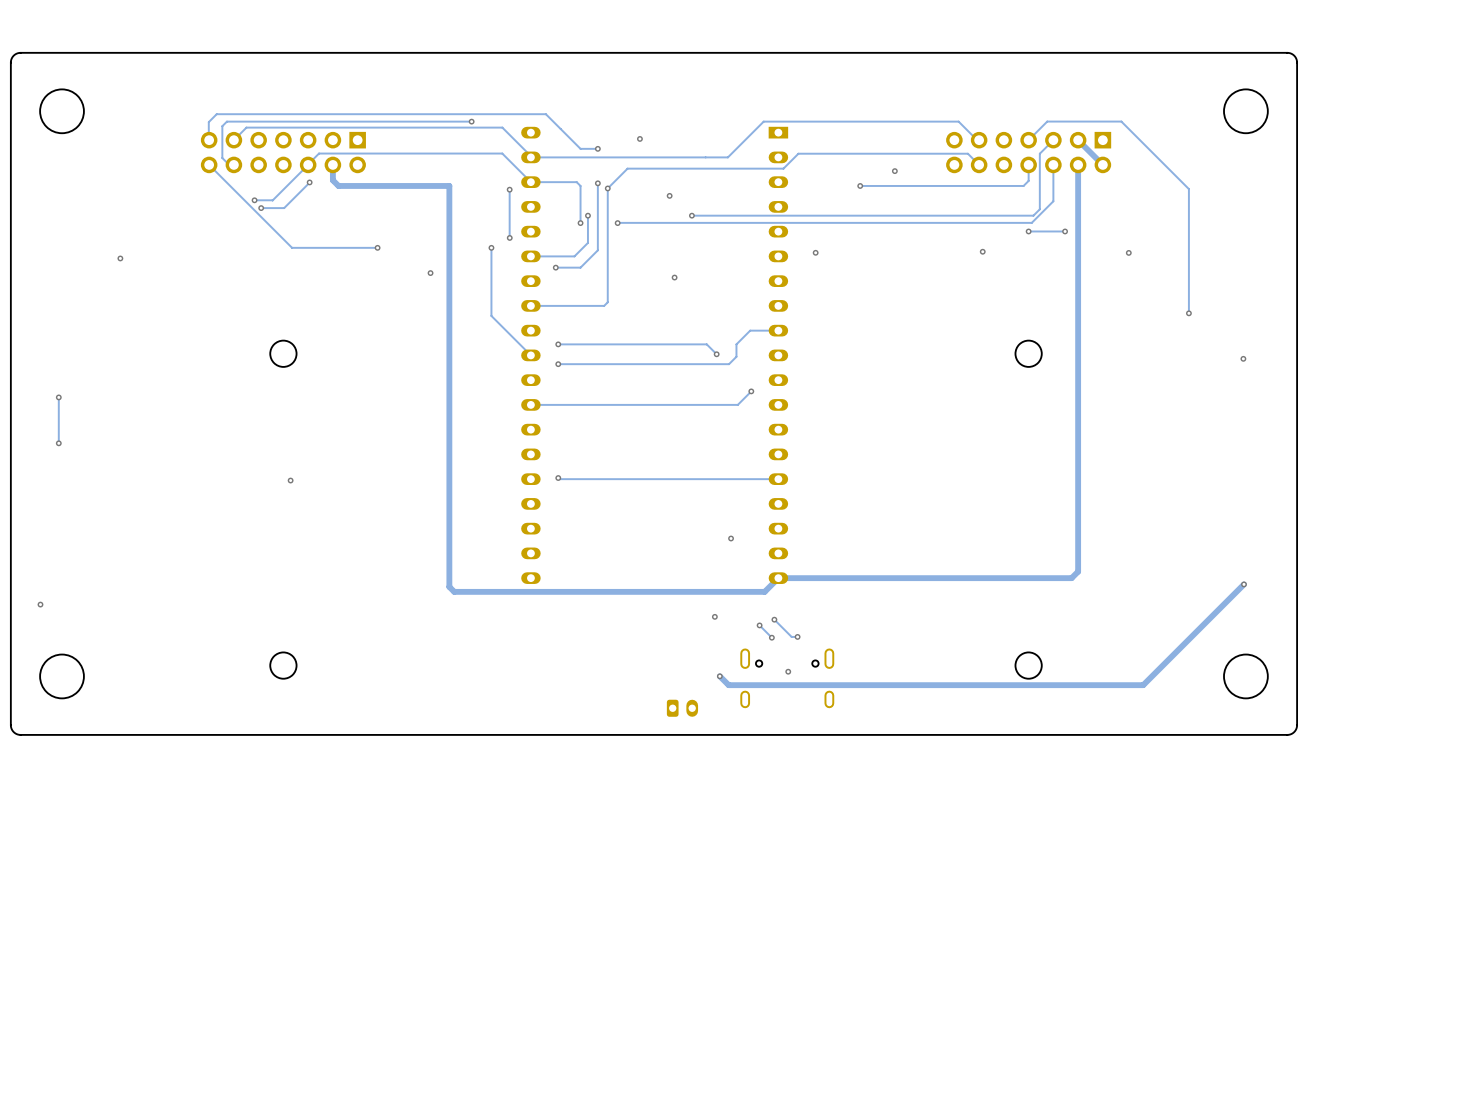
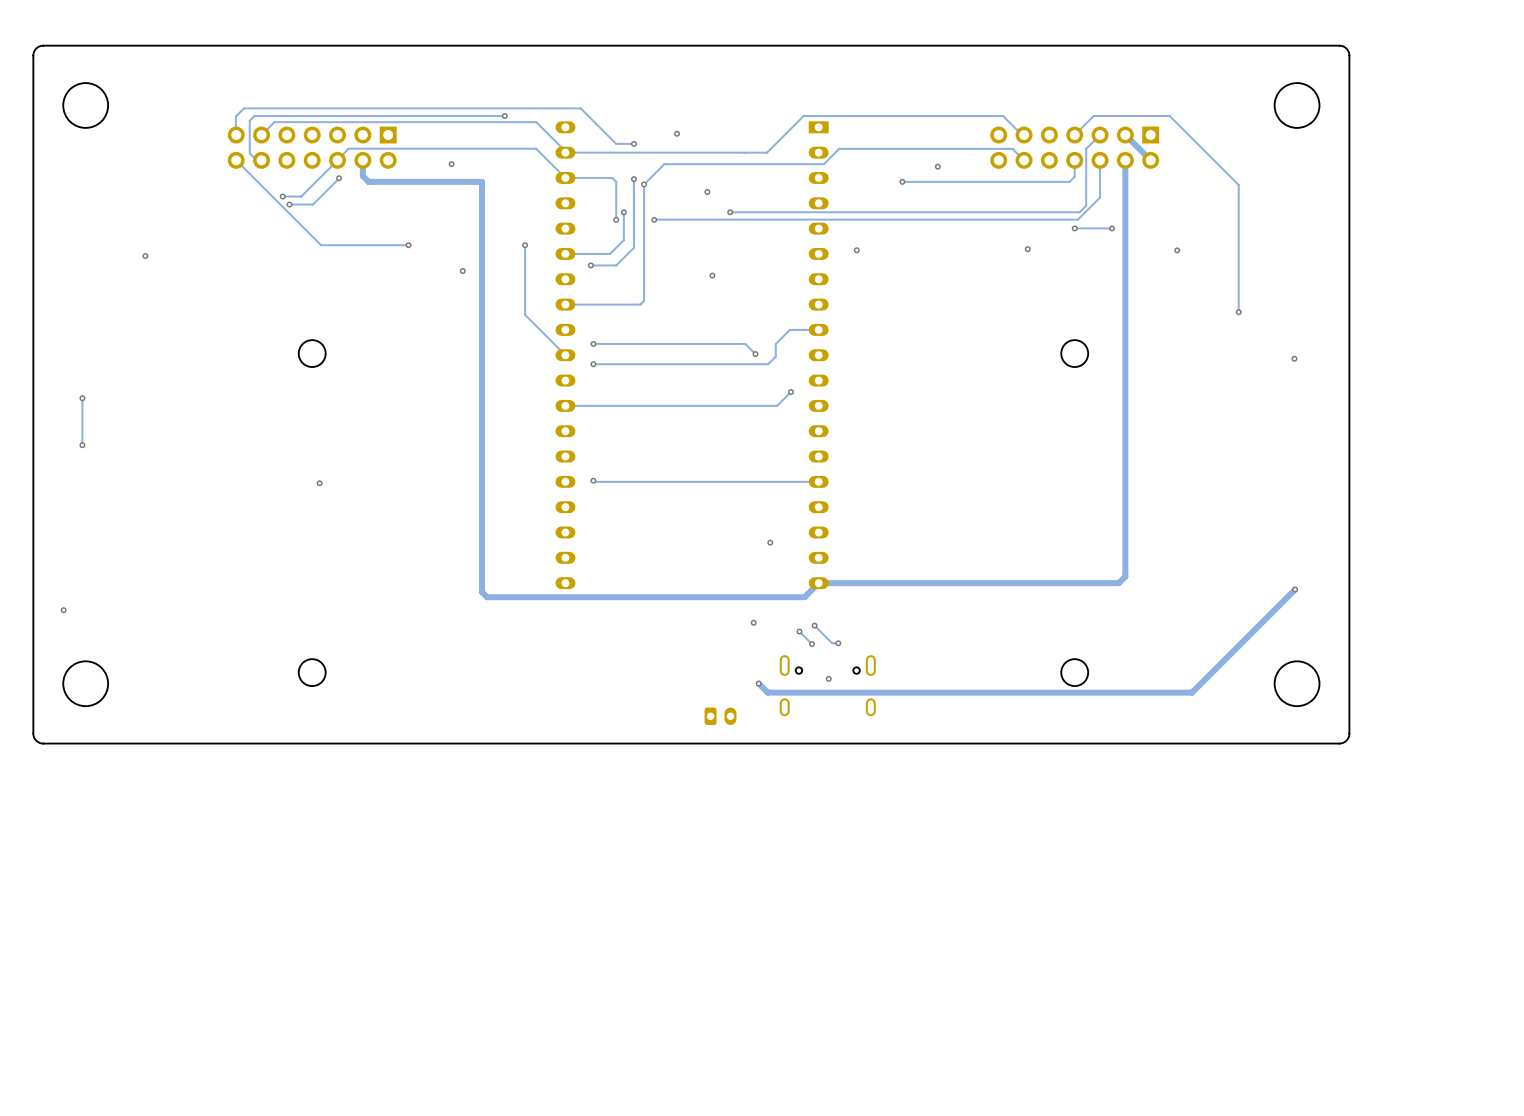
via: none -> (451, 164)
track: (509, 189) (509, 237) -> none
via: (509, 189) -> none
via: (509, 237) -> none

